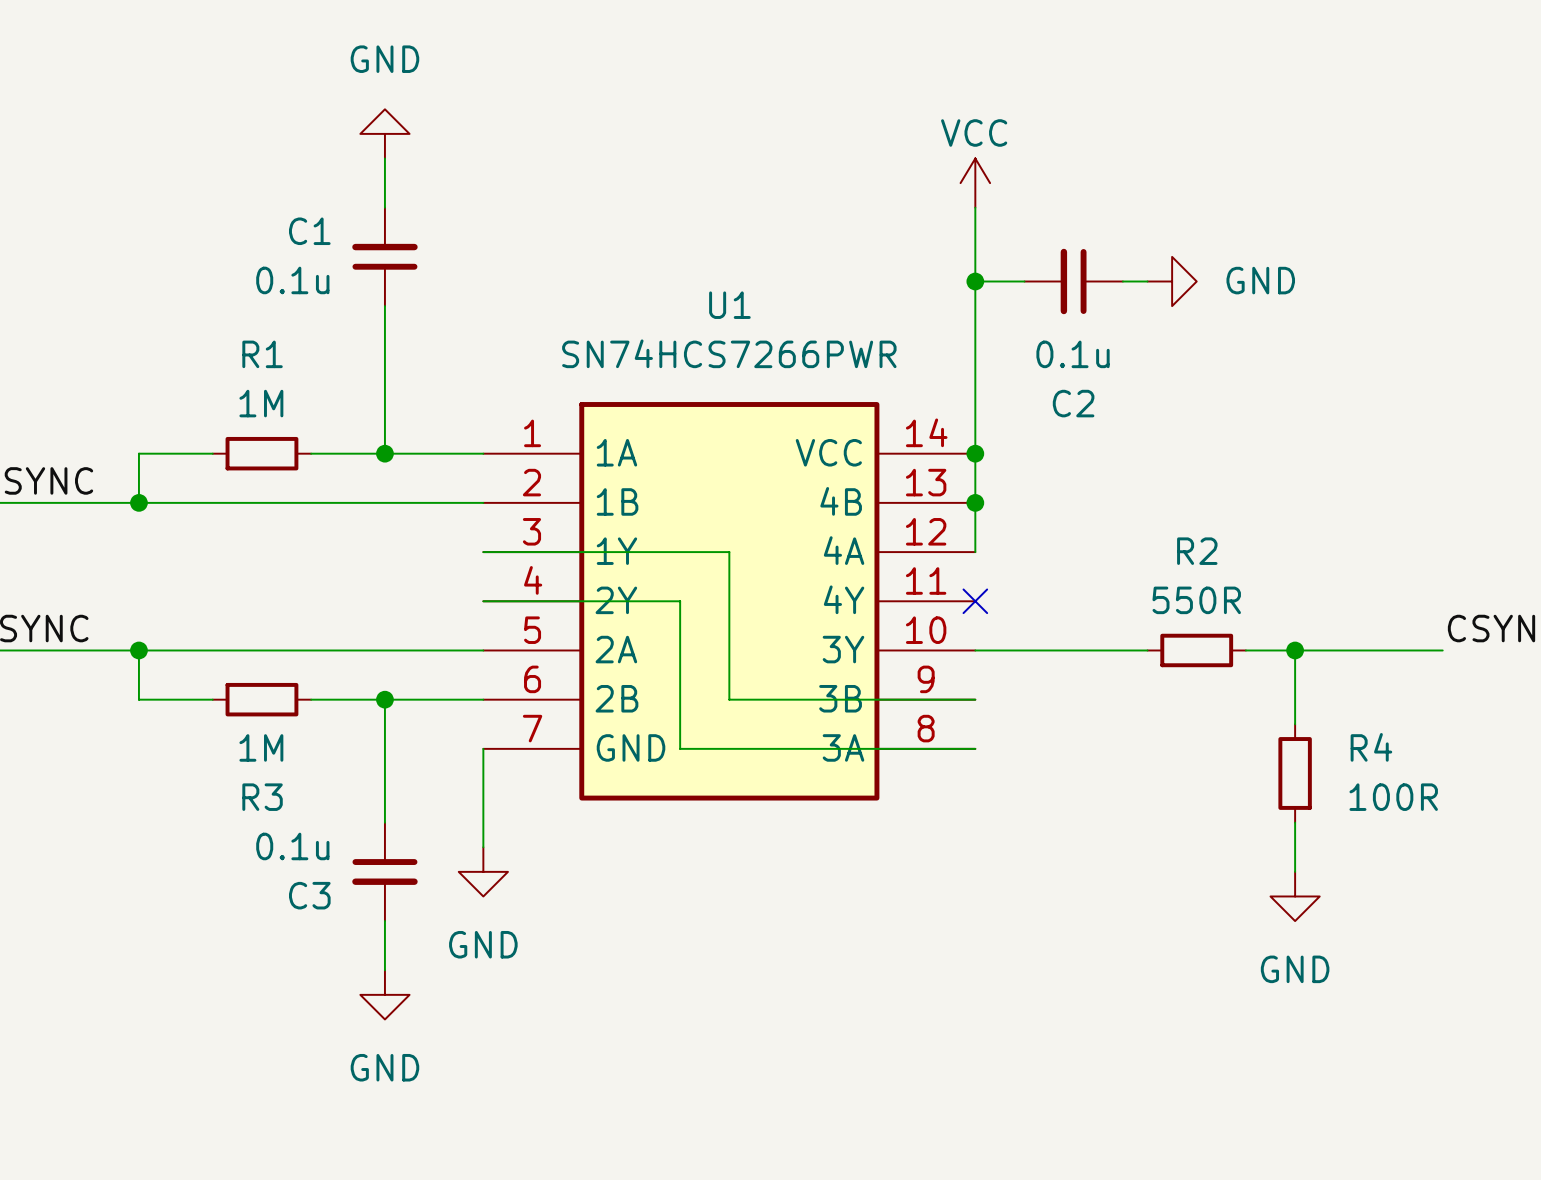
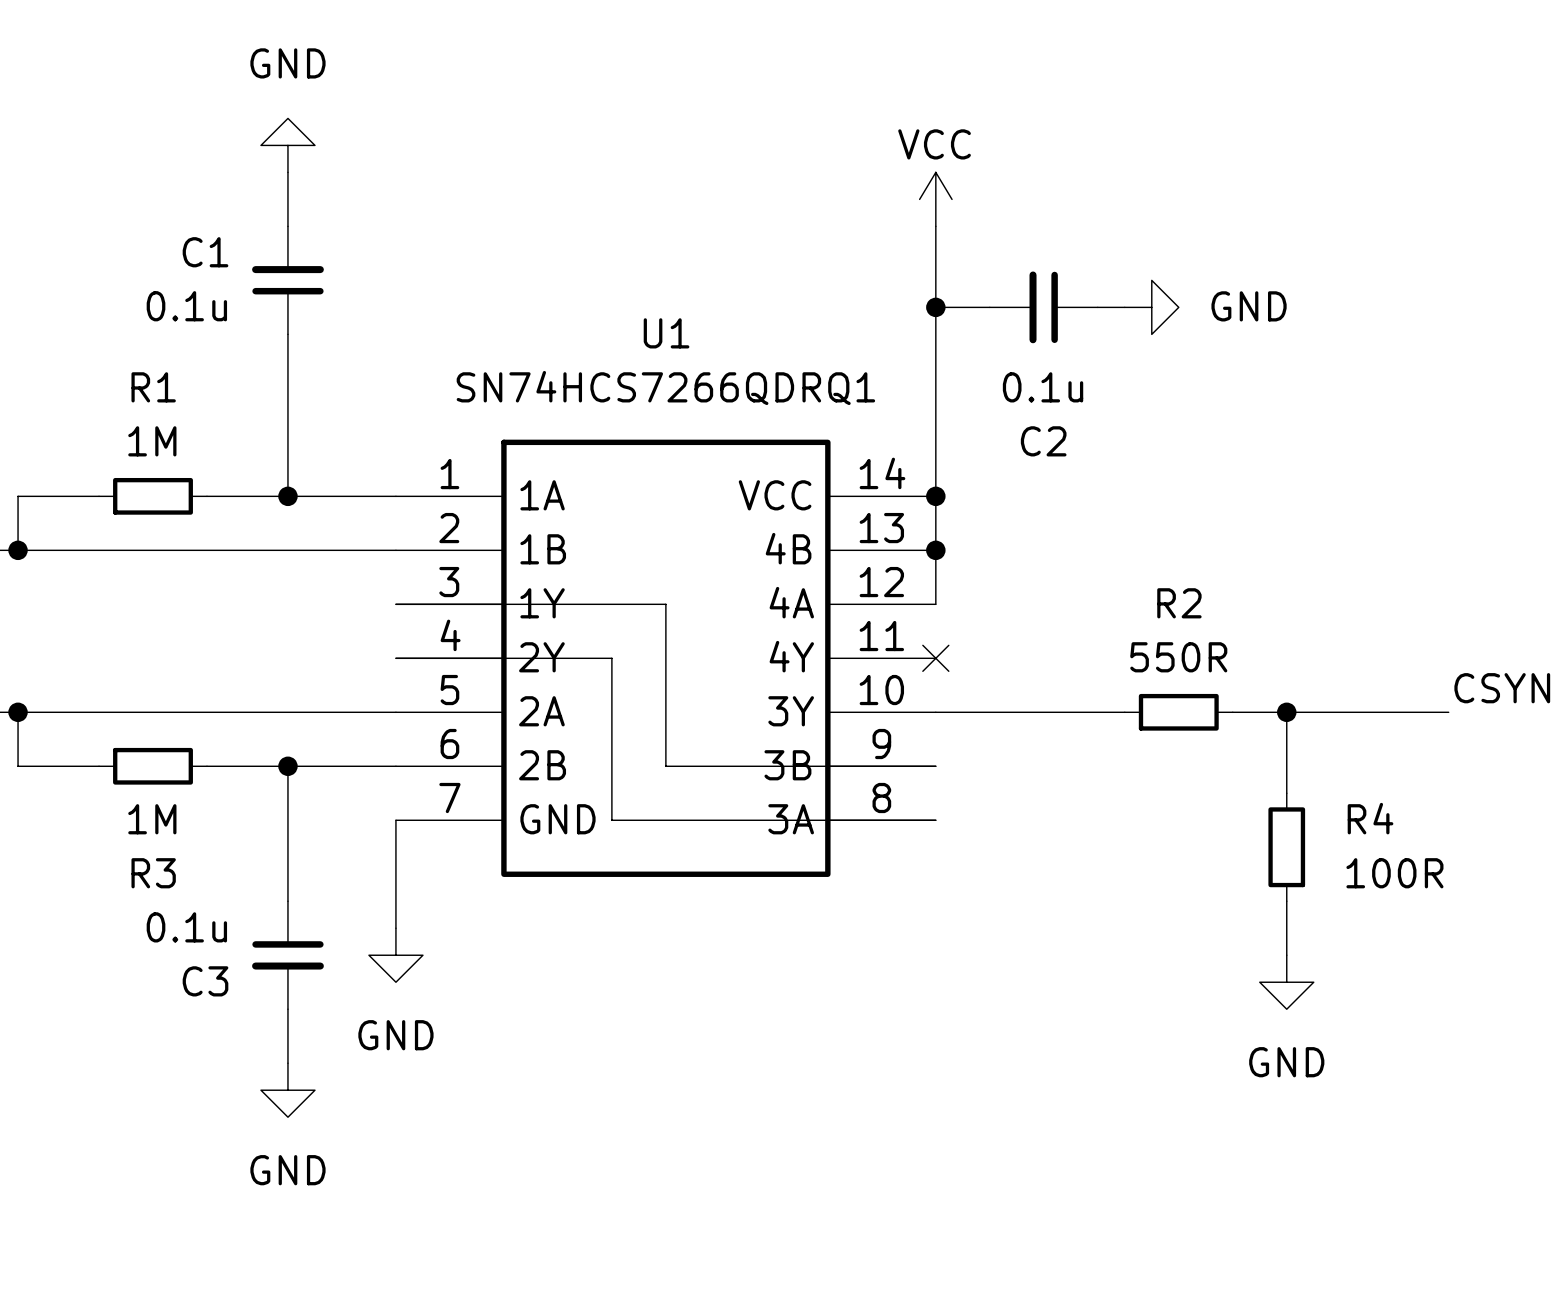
U1 value: SN74HCS7266PWR (729, 353) -> SN74HCS7266QDRQ1 (665, 387)

